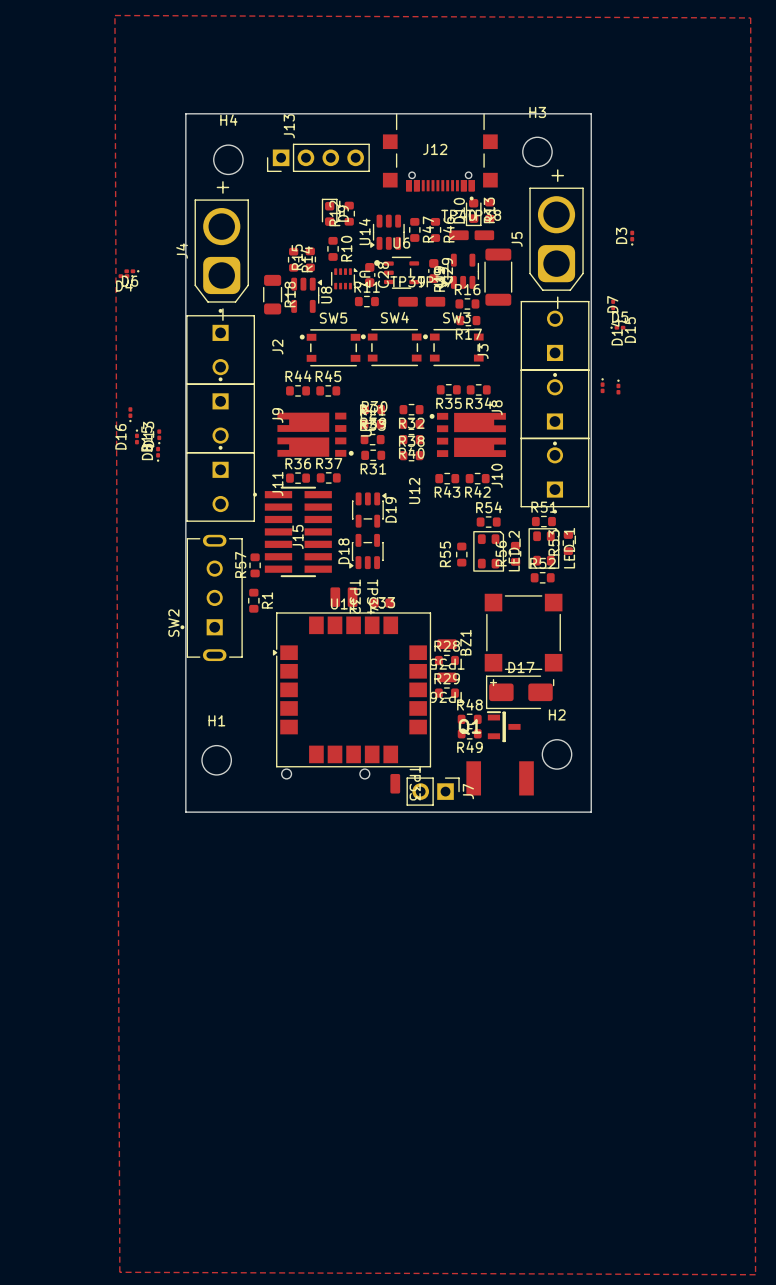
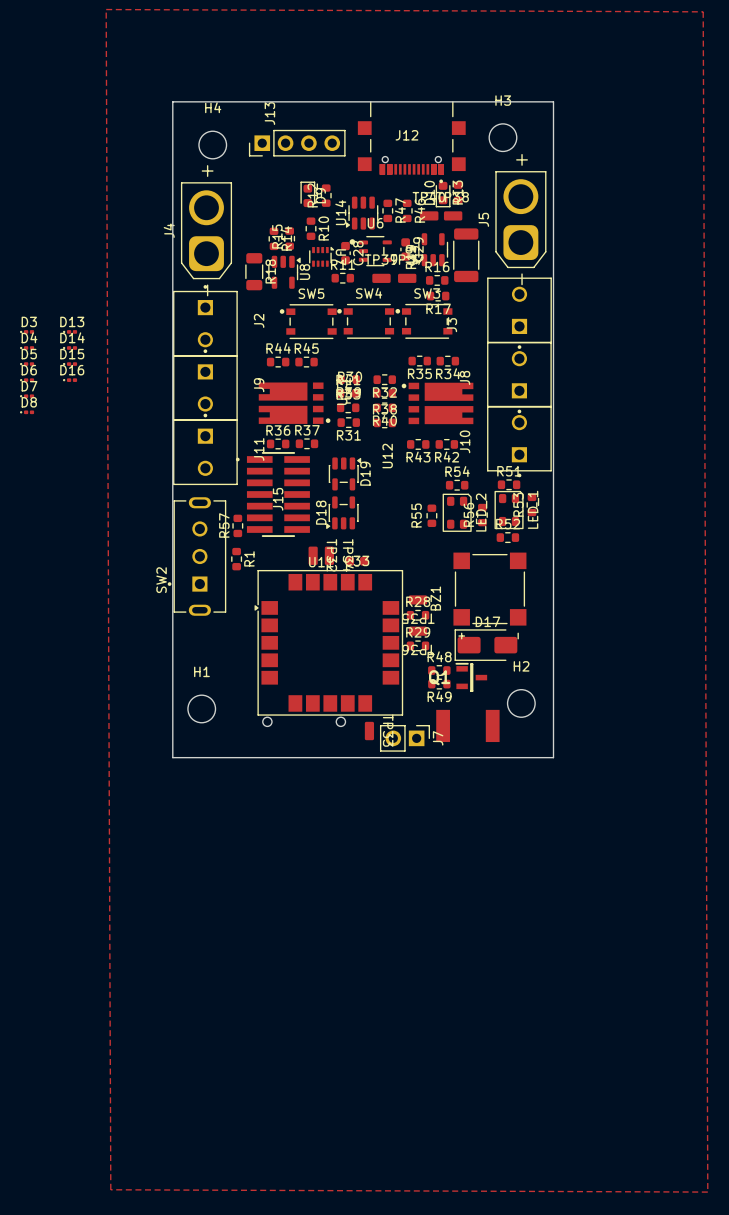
D3 rotation: 0° (632, 238) -> 90° clockwise (27, 331)
D3 position: (632, 238) -> (27, 331)
D6 rotation: 0° (131, 271) -> 180° (27, 380)
D6 position: (131, 271) -> (27, 380)
D4 rotation: 0° (125, 276) -> 180° (27, 348)
D4 position: (125, 276) -> (27, 348)
D7 rotation: 0° (613, 306) -> 90° clockwise (27, 396)
D7 position: (613, 306) -> (27, 396)
D5 position: (618, 327) -> (27, 364)
D14 name position: D14 (616, 332) -> D14 (72, 337)
D14 rotation: 0° (602, 385) -> 90° counterclockwise (70, 348)
D14 position: (602, 385) -> (70, 348)
D15: (618, 387) -> none
D16 rotation: 0° (130, 414) -> 90° clockwise (70, 380)
D16 position: (130, 414) -> (70, 380)
D16 name position: D16 (120, 436) -> D16 (72, 370)
D13 rotation: 0° (159, 436) -> 90° clockwise (70, 331)
D13 position: (159, 436) -> (70, 331)
D15 rotation: 0° (136, 437) -> 90° counterclockwise (70, 364)
D15 position: (136, 437) -> (70, 364)
D8 rotation: 0° (158, 454) -> 90° clockwise (27, 412)
D8 position: (158, 454) -> (27, 412)

